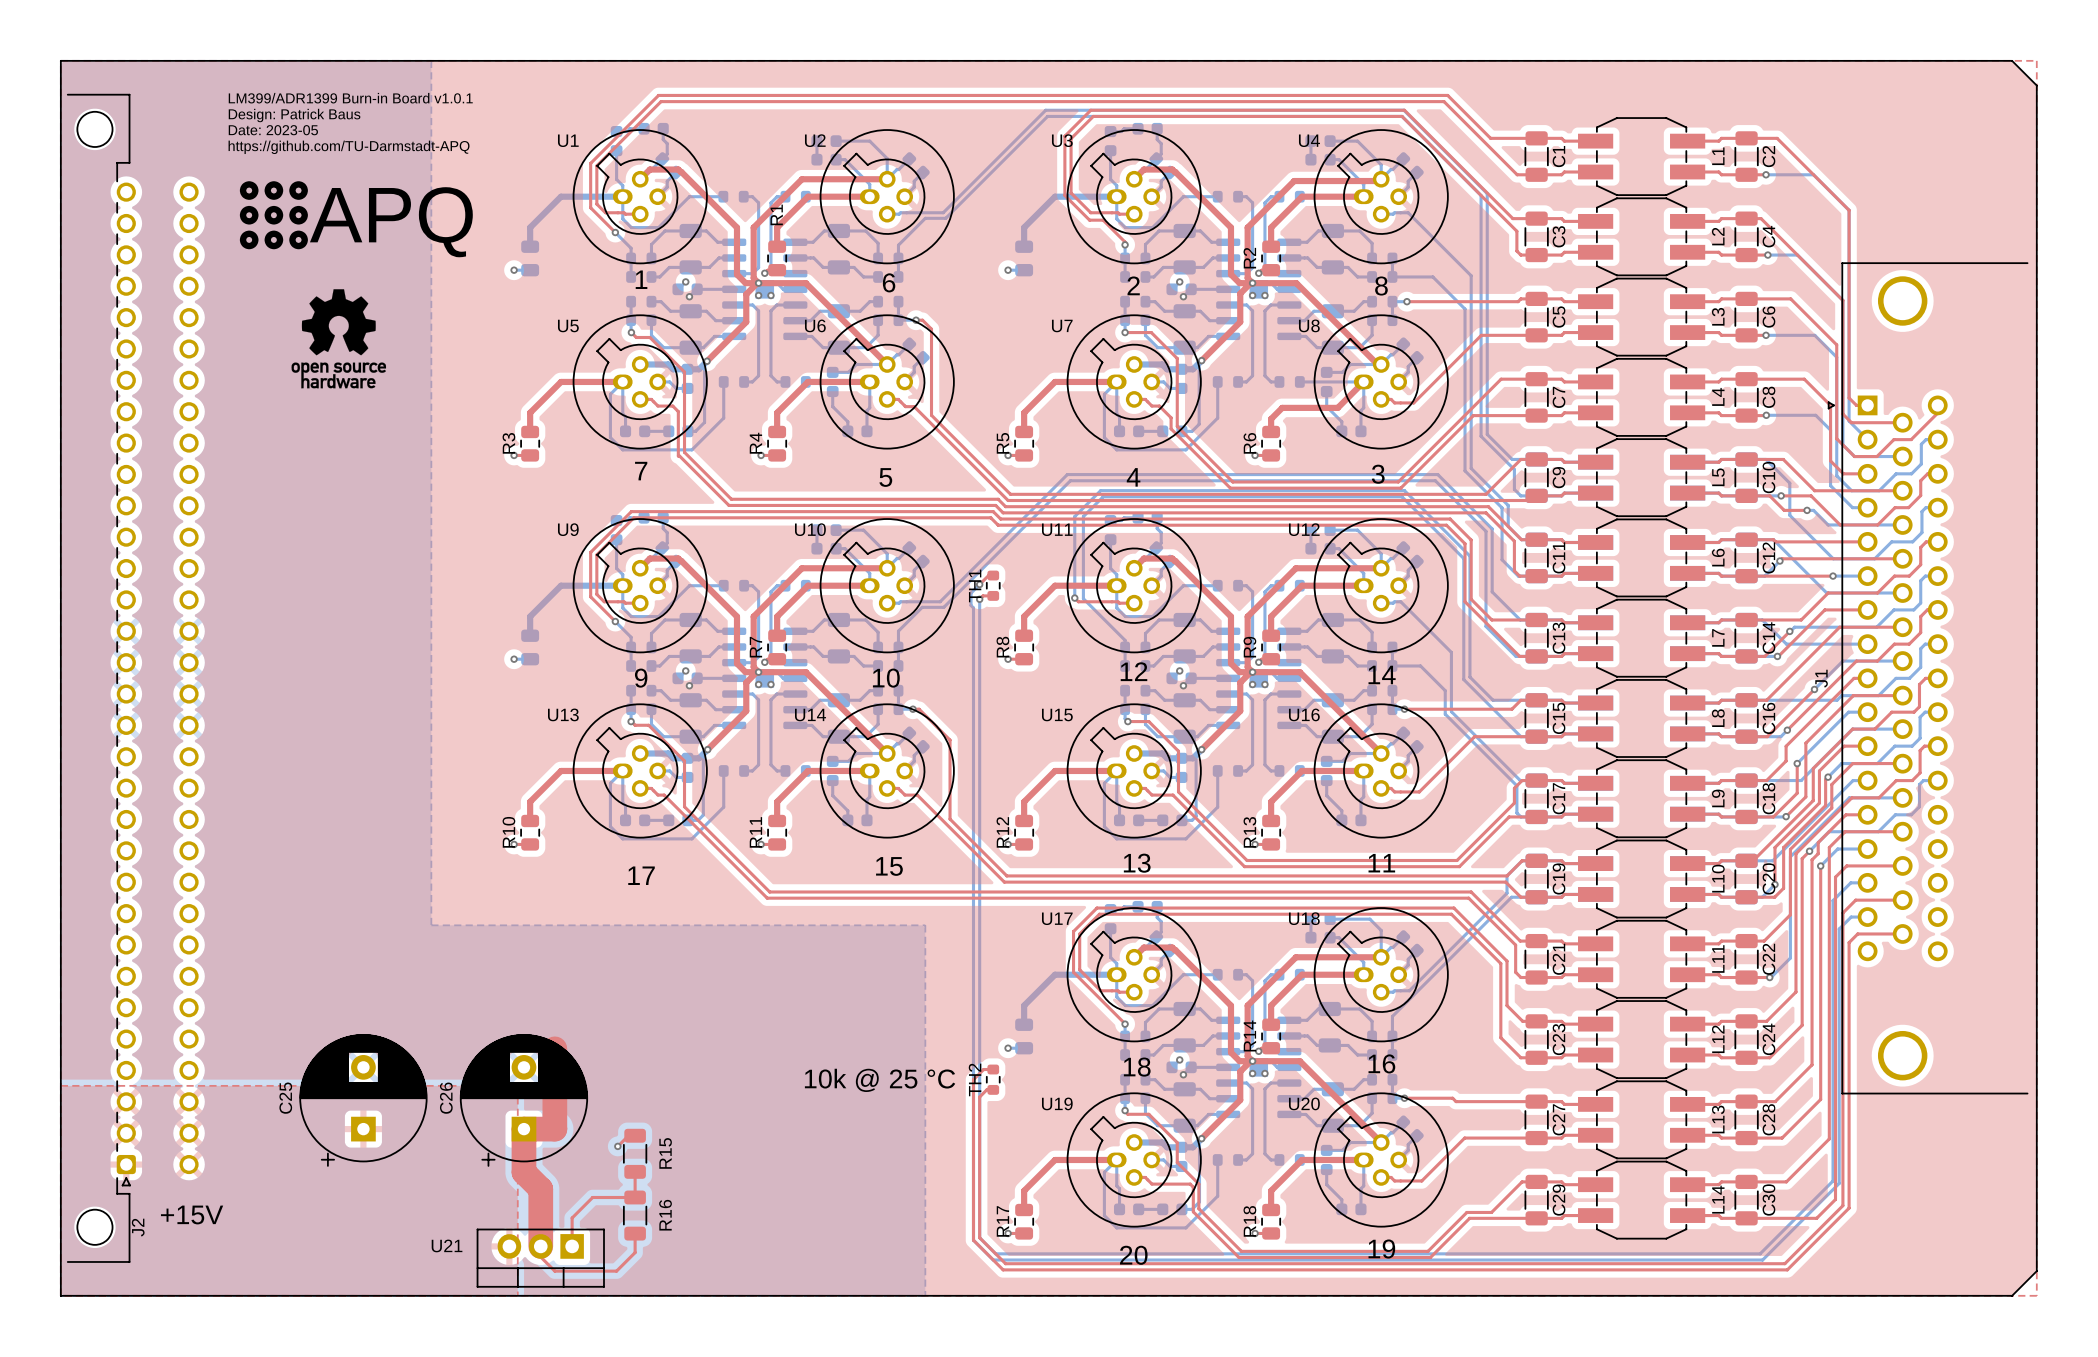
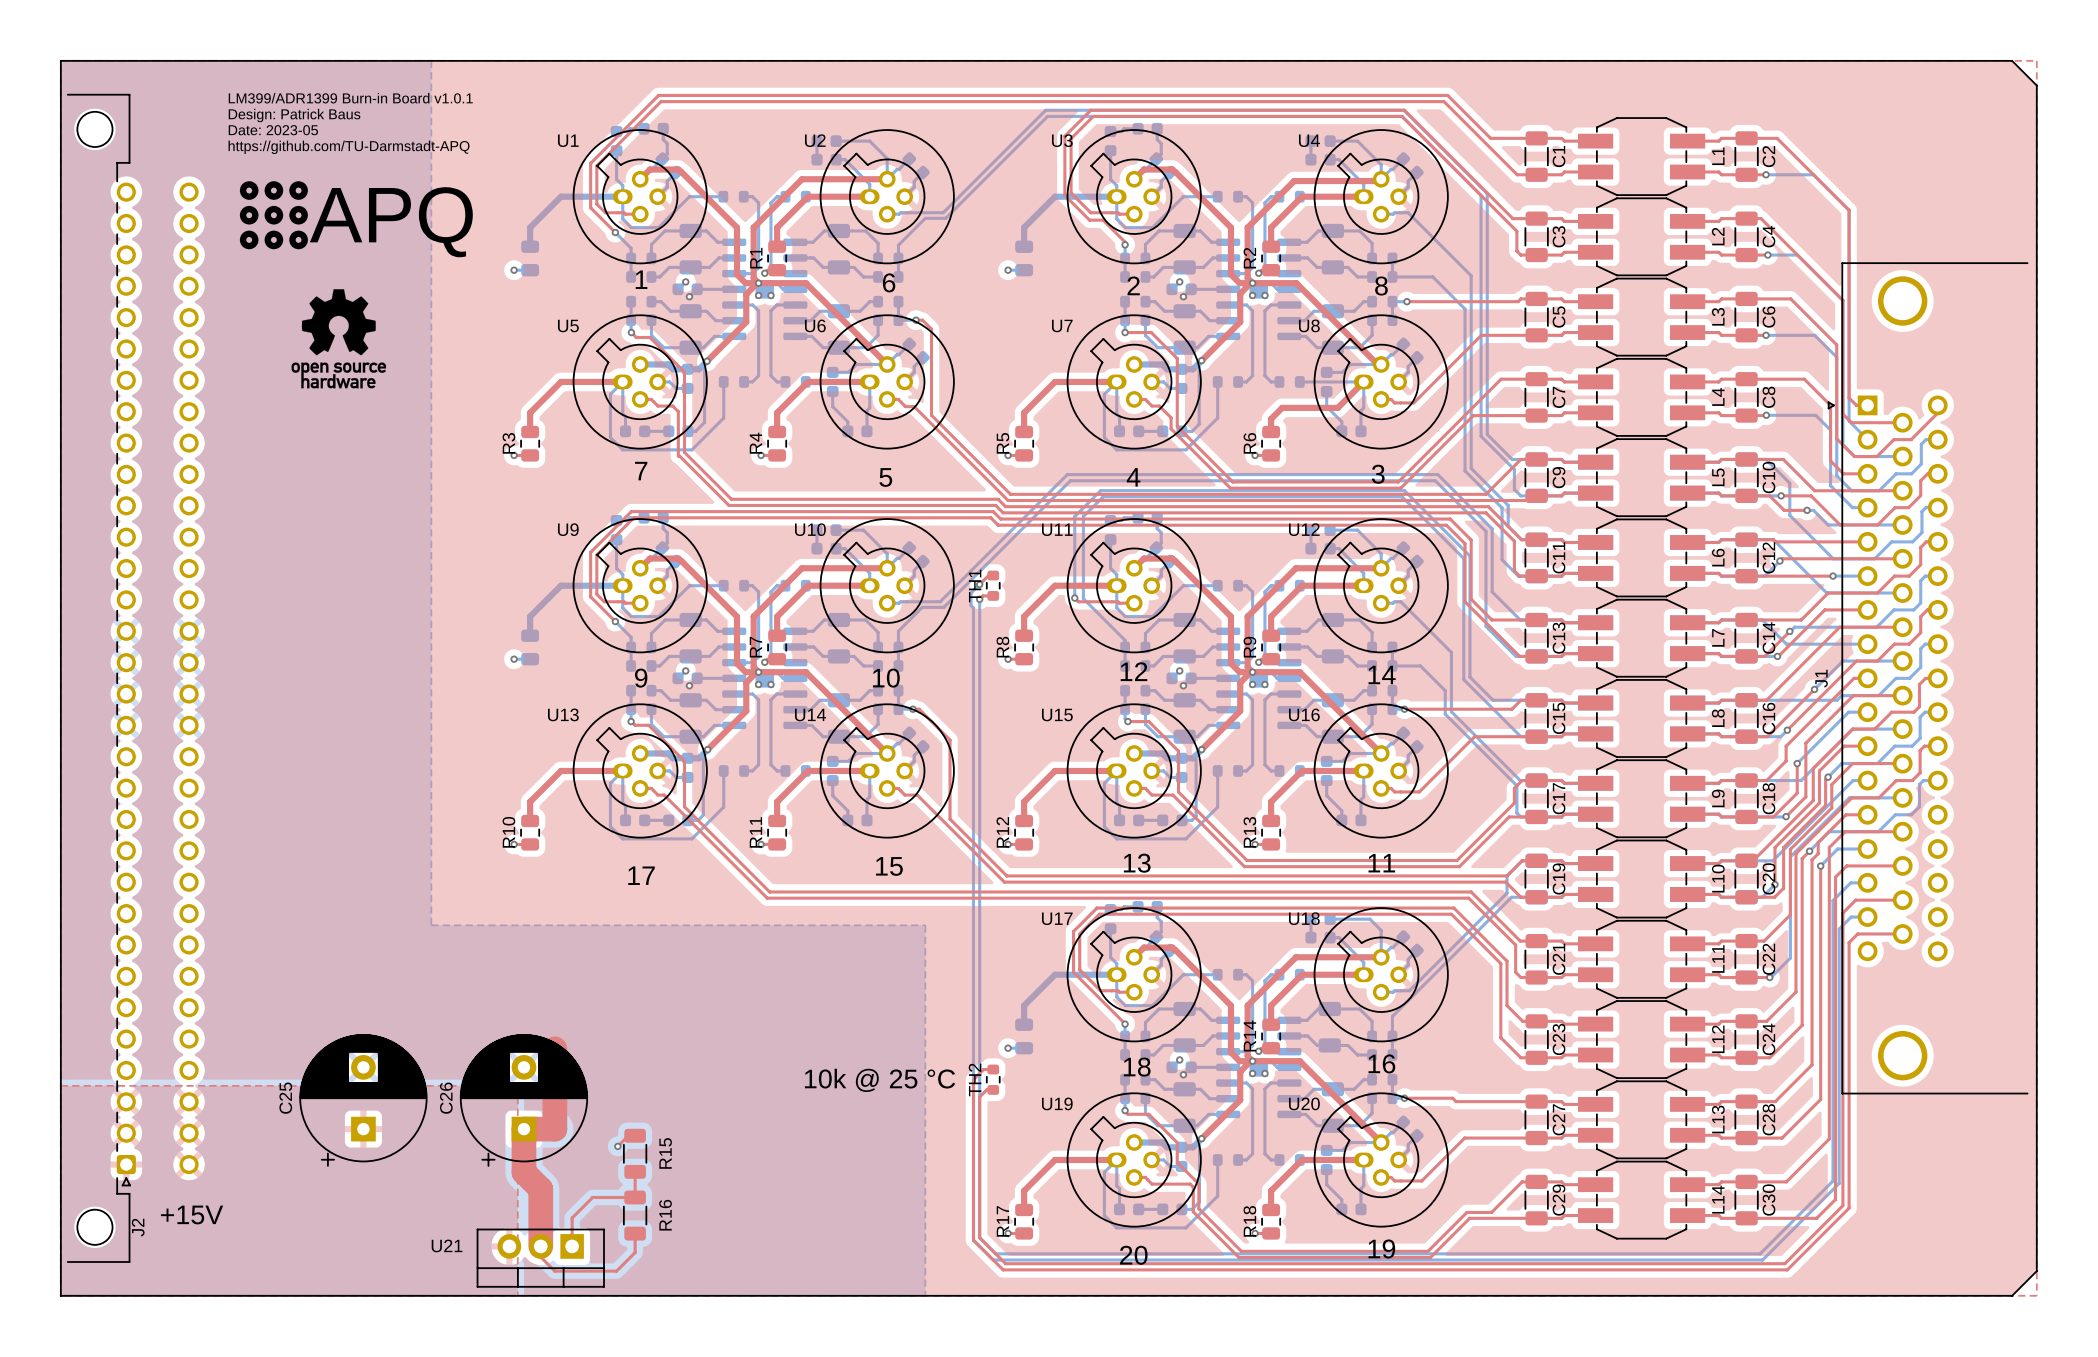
R1 name position: R1 (776, 214) -> R1 (756, 258)

